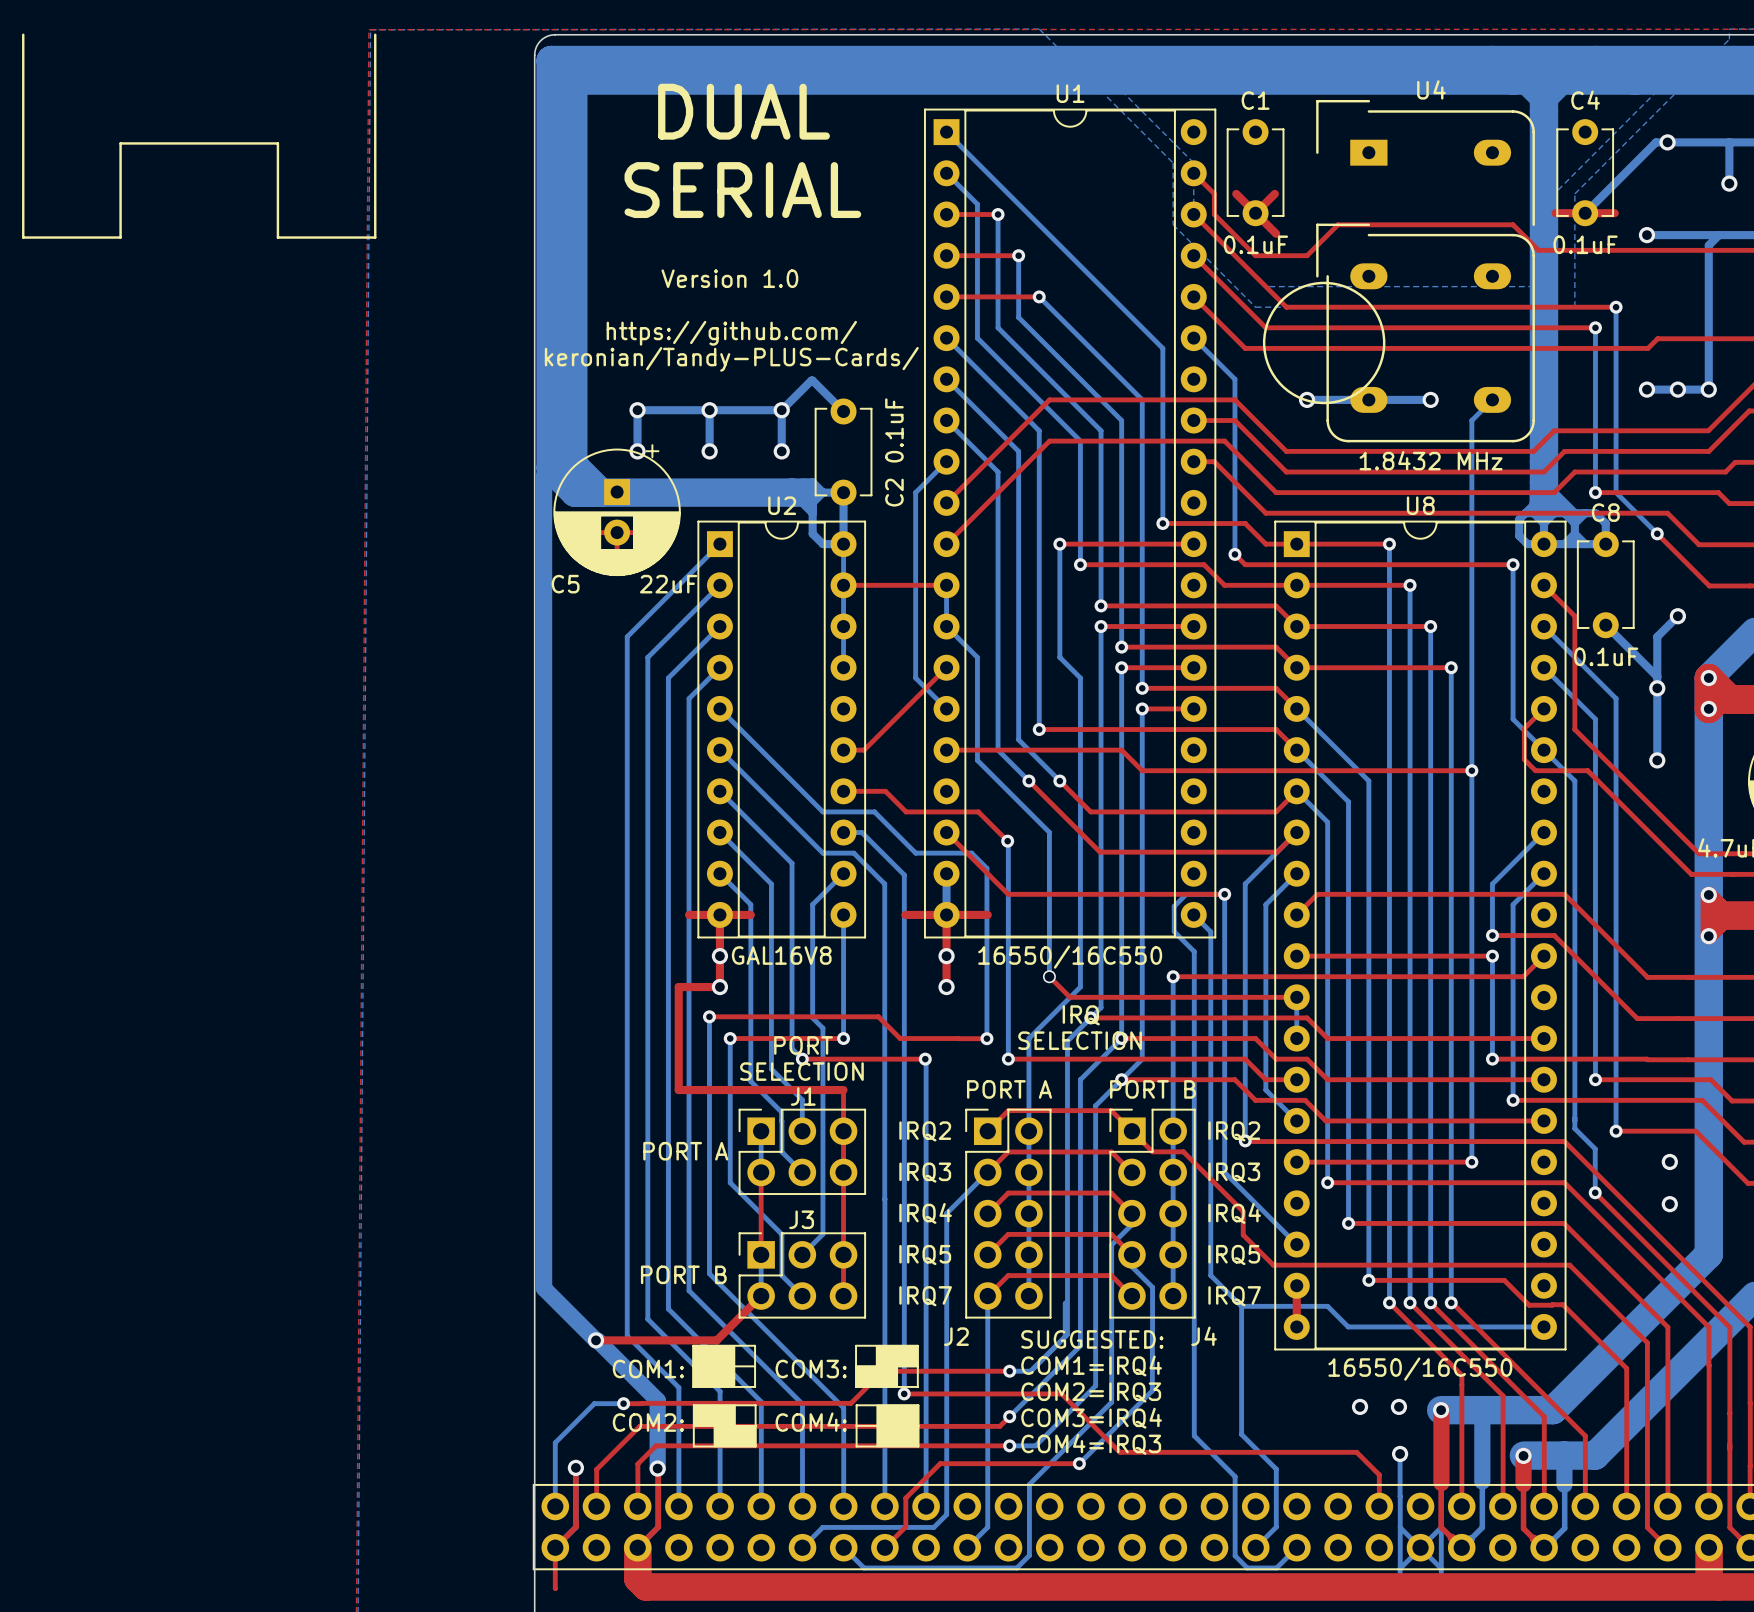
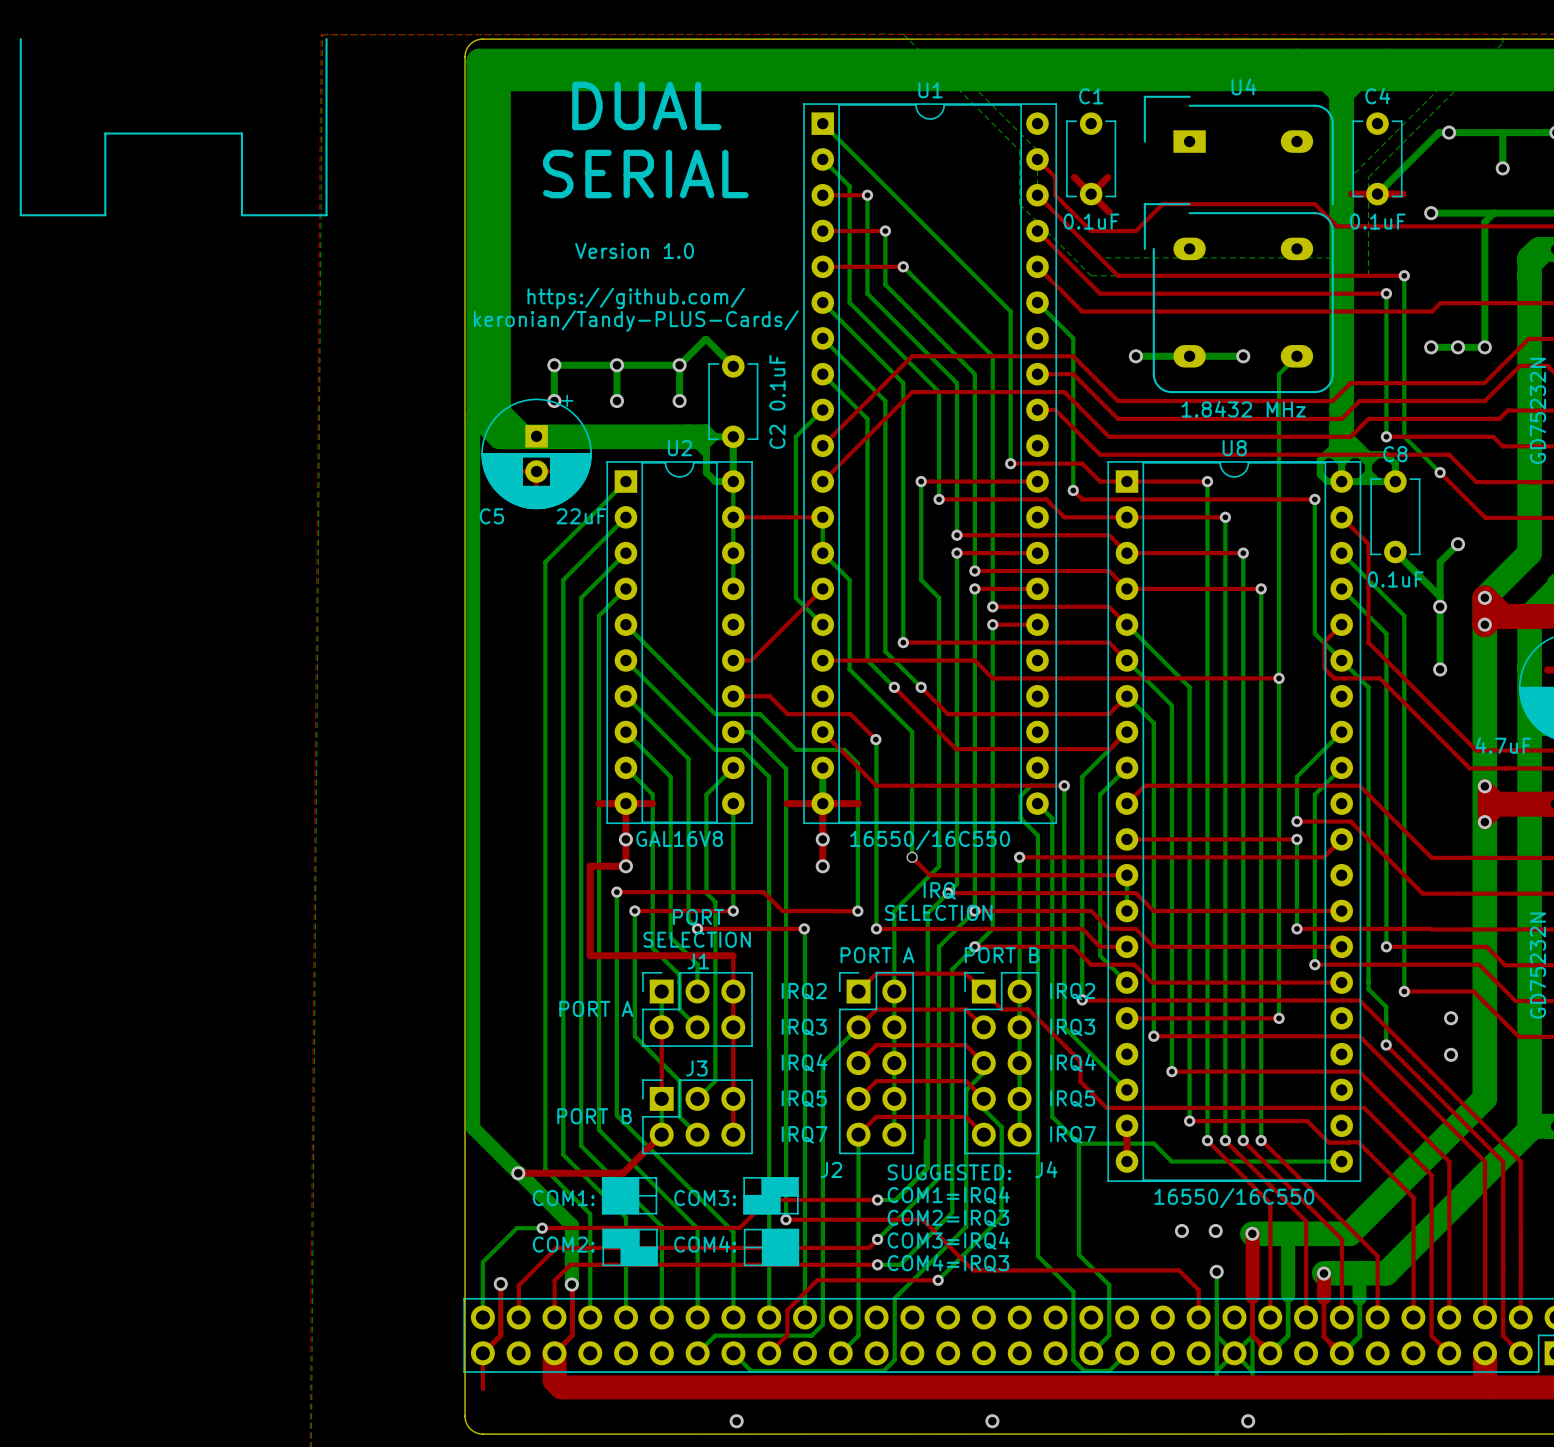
drawing: [1262, 281, 1386, 405] -> none

